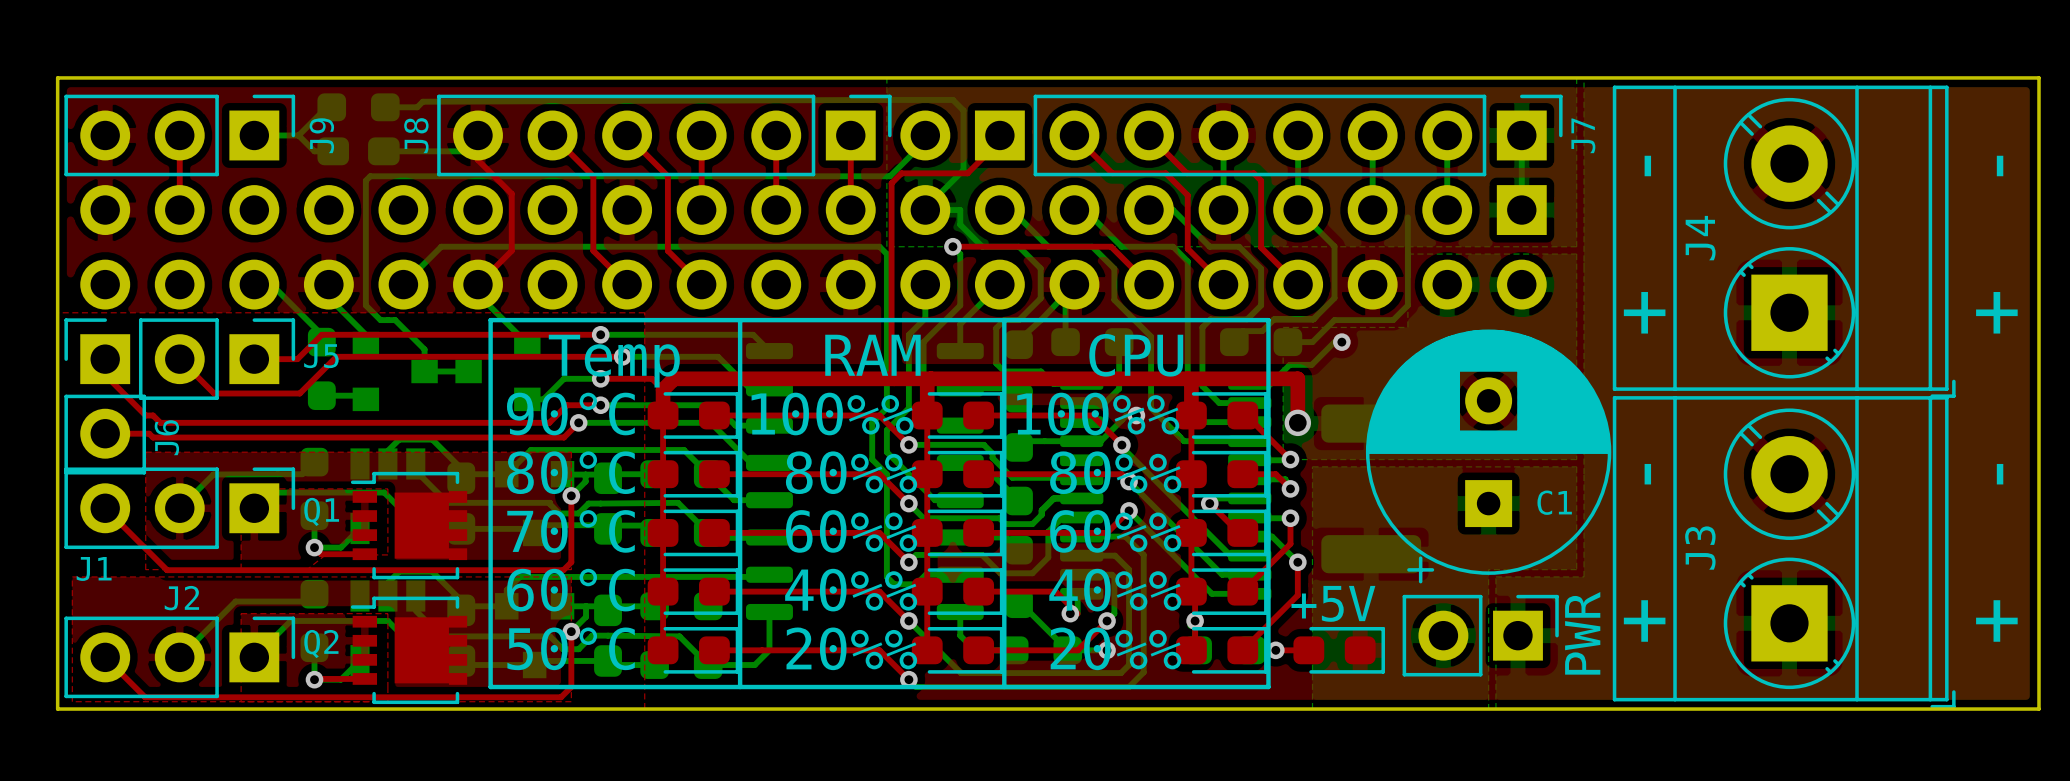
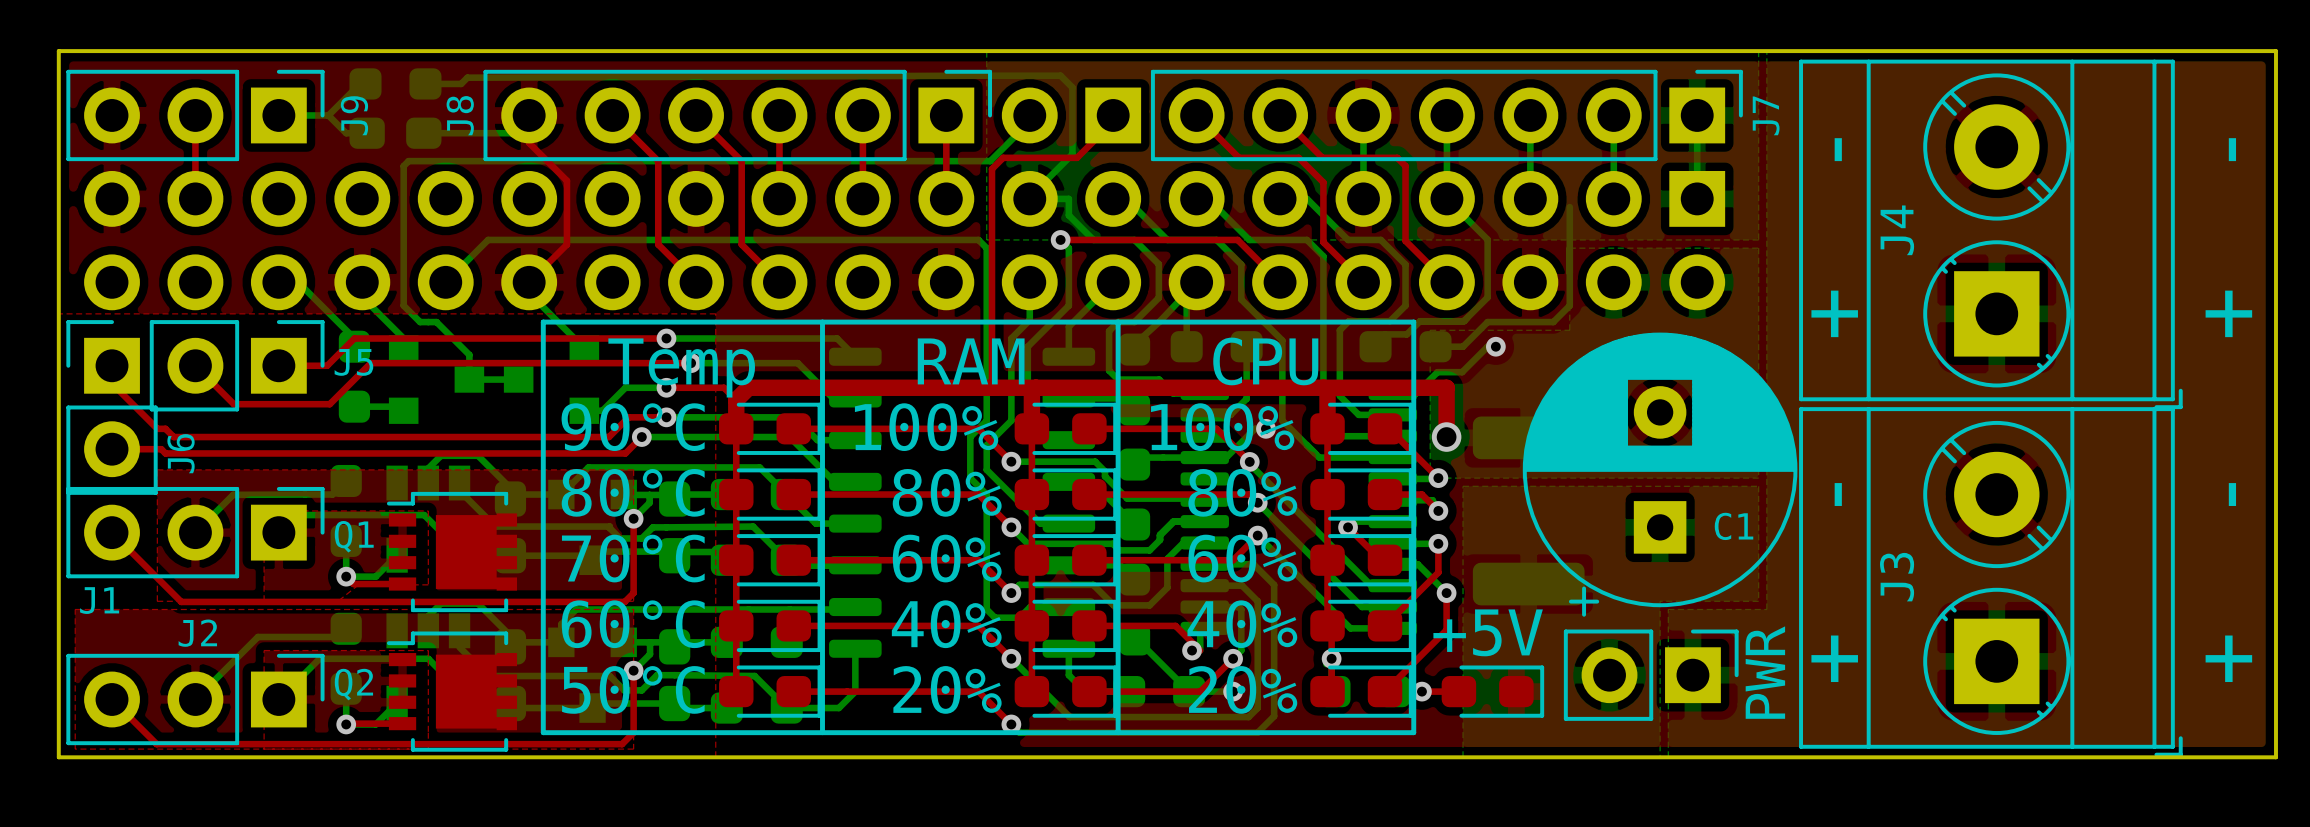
part text: 100%% (832, 414) -> none
part value: none -> 100% (926, 427)
part value: none -> 100% (1222, 427)
part text: 100%% (1098, 414) -> none
part text: 80%% (851, 472) -> none
part value: none -> 80% (947, 492)
part text: 80%% (1115, 472) -> none
part value: none -> 80% (1242, 492)
part text: 60%% (851, 531) -> none
part value: none -> 60% (947, 558)
part text: 60%% (1115, 531) -> none
part value: none -> 60% (1242, 558)
part text: 40%% (851, 590) -> none
part value: none -> 40% (946, 624)
part text: 40%% (1115, 590) -> none
part value: none -> 40% (1242, 624)
text: none -> +5V (1488, 632)
part text: +5V (1333, 603) -> none
part text: 20%% (851, 648) -> none
part value: none -> 20% (947, 689)
part text: 20%% (1116, 648) -> none
part value: none -> 20% (1243, 689)

